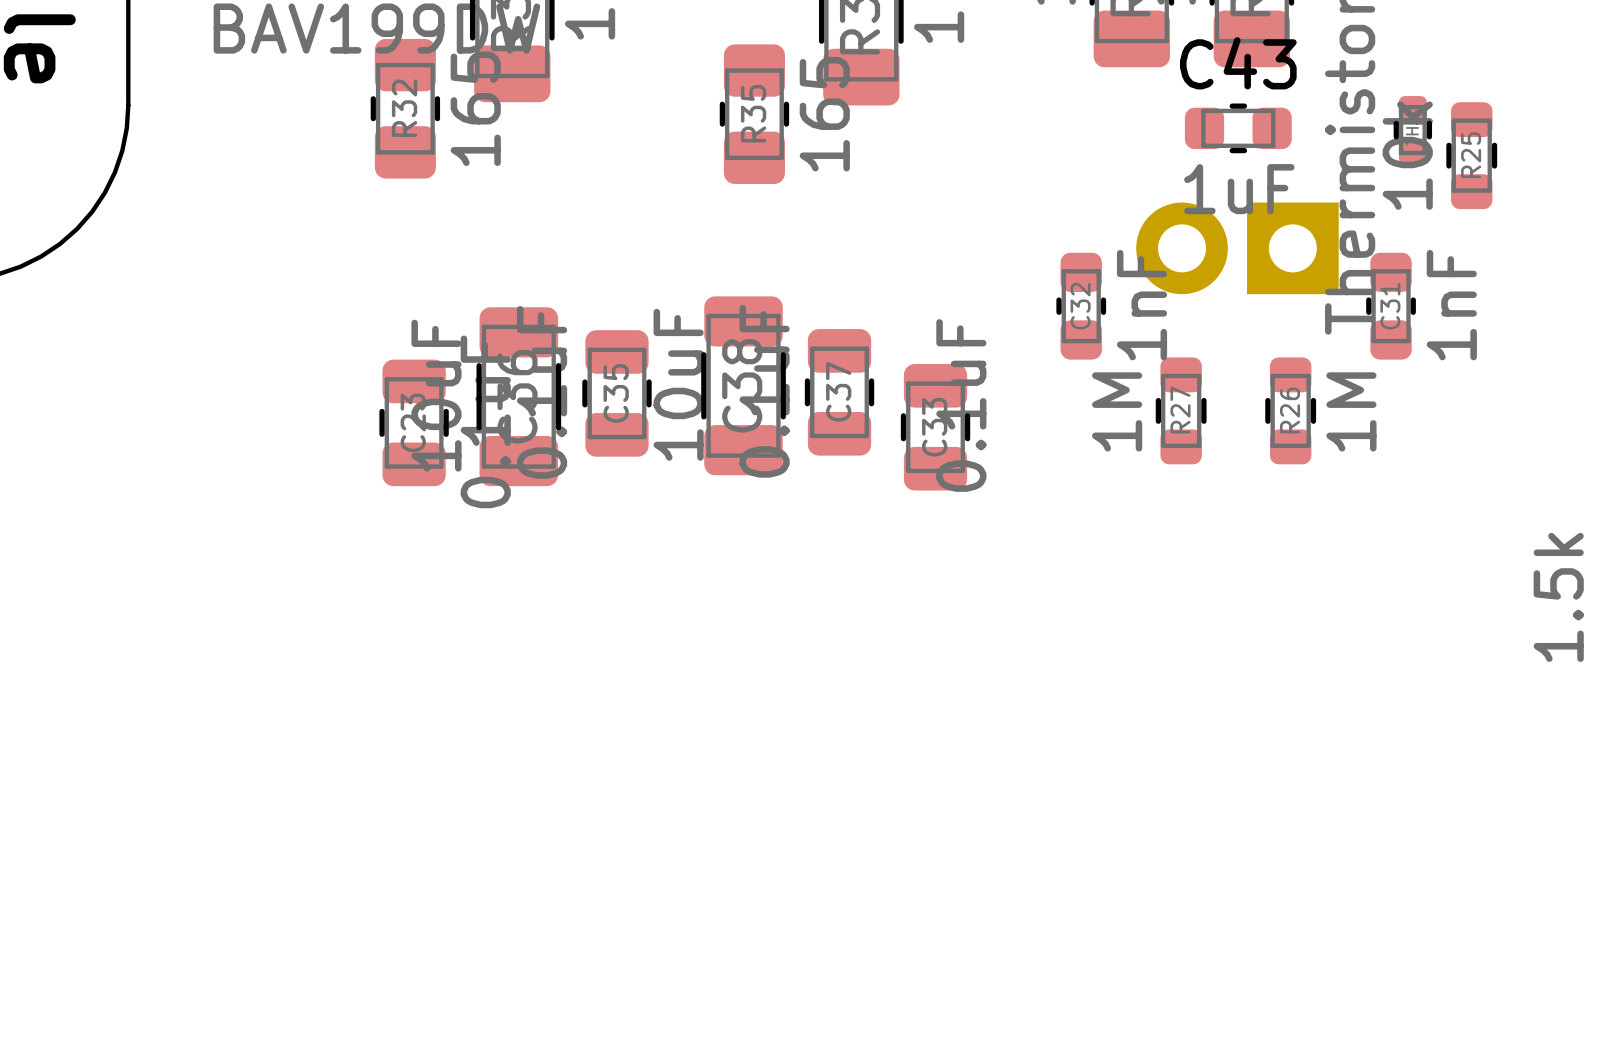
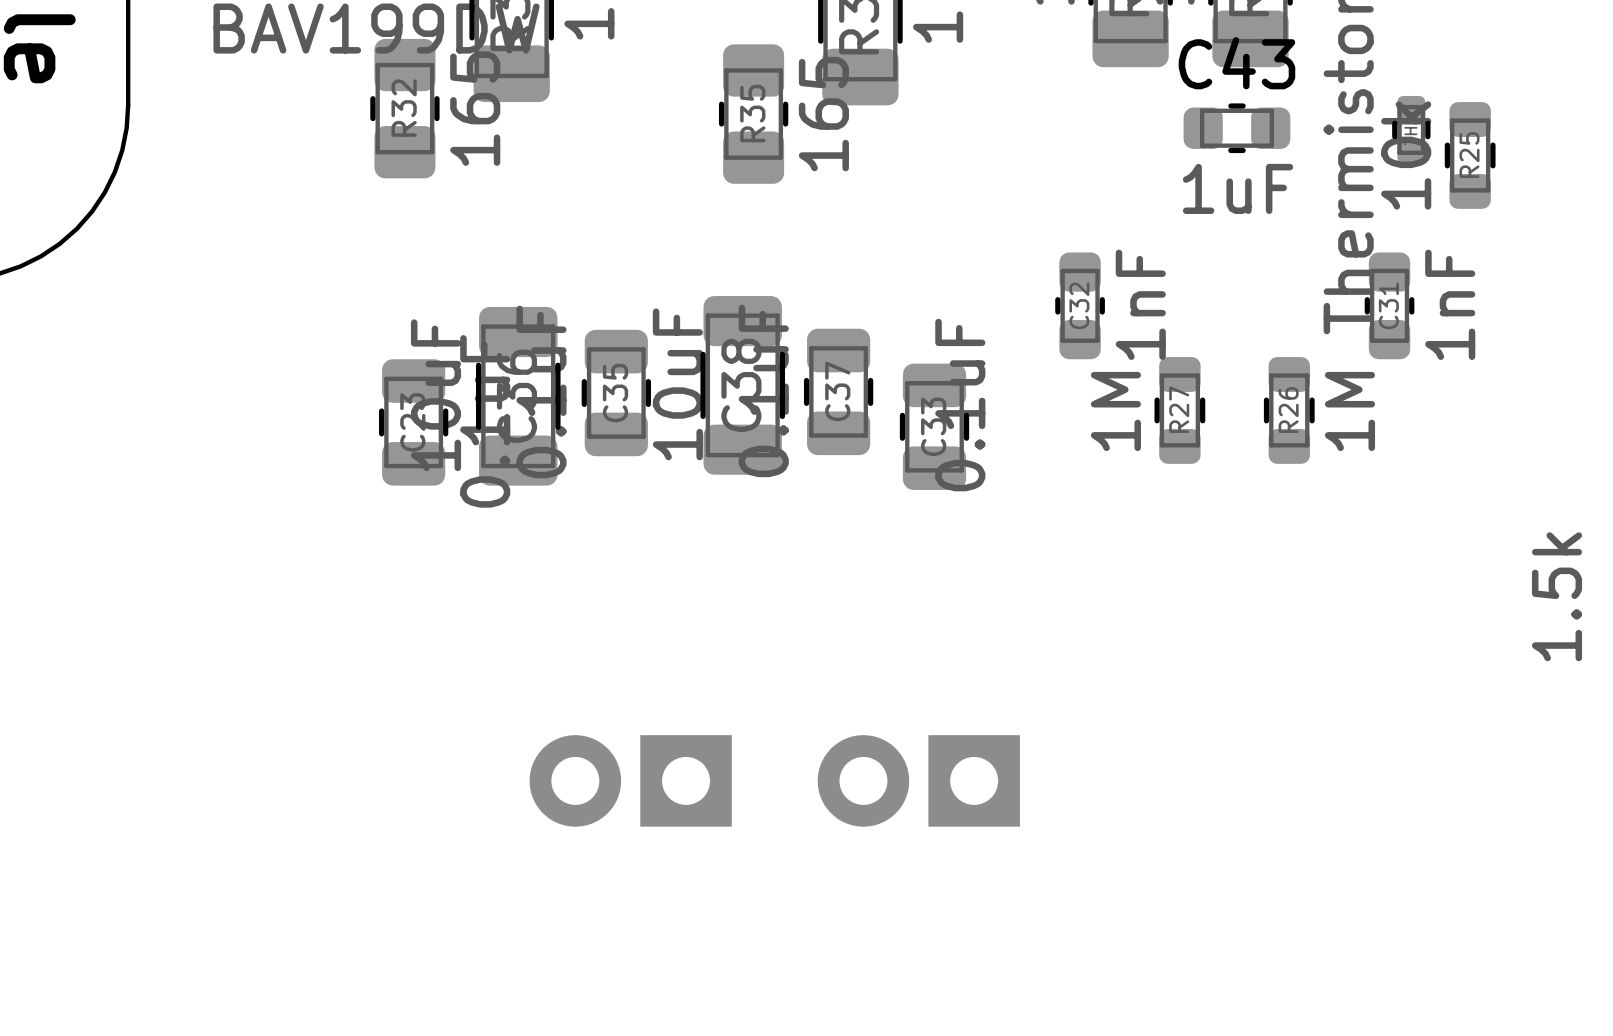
part: (1237, 248) -> none
part: none -> (630, 780)
part: none -> (918, 780)

